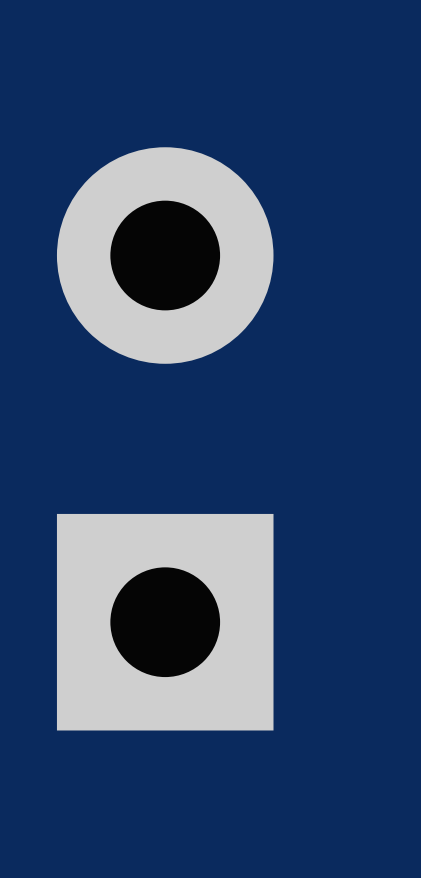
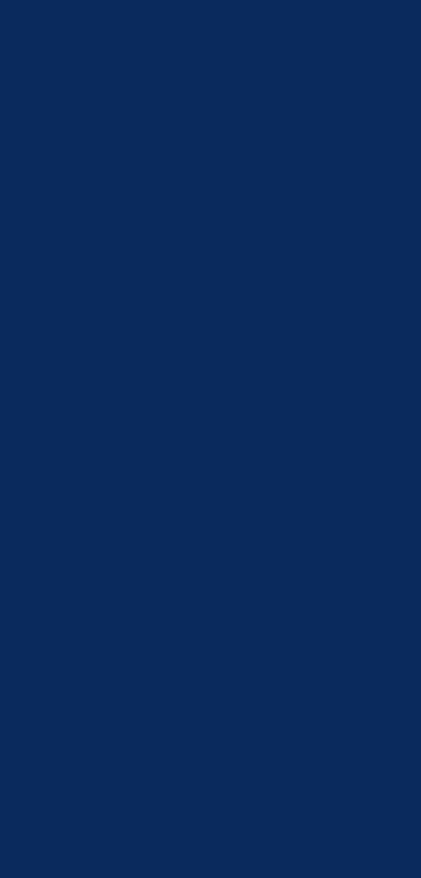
part: (165, 438) -> none

